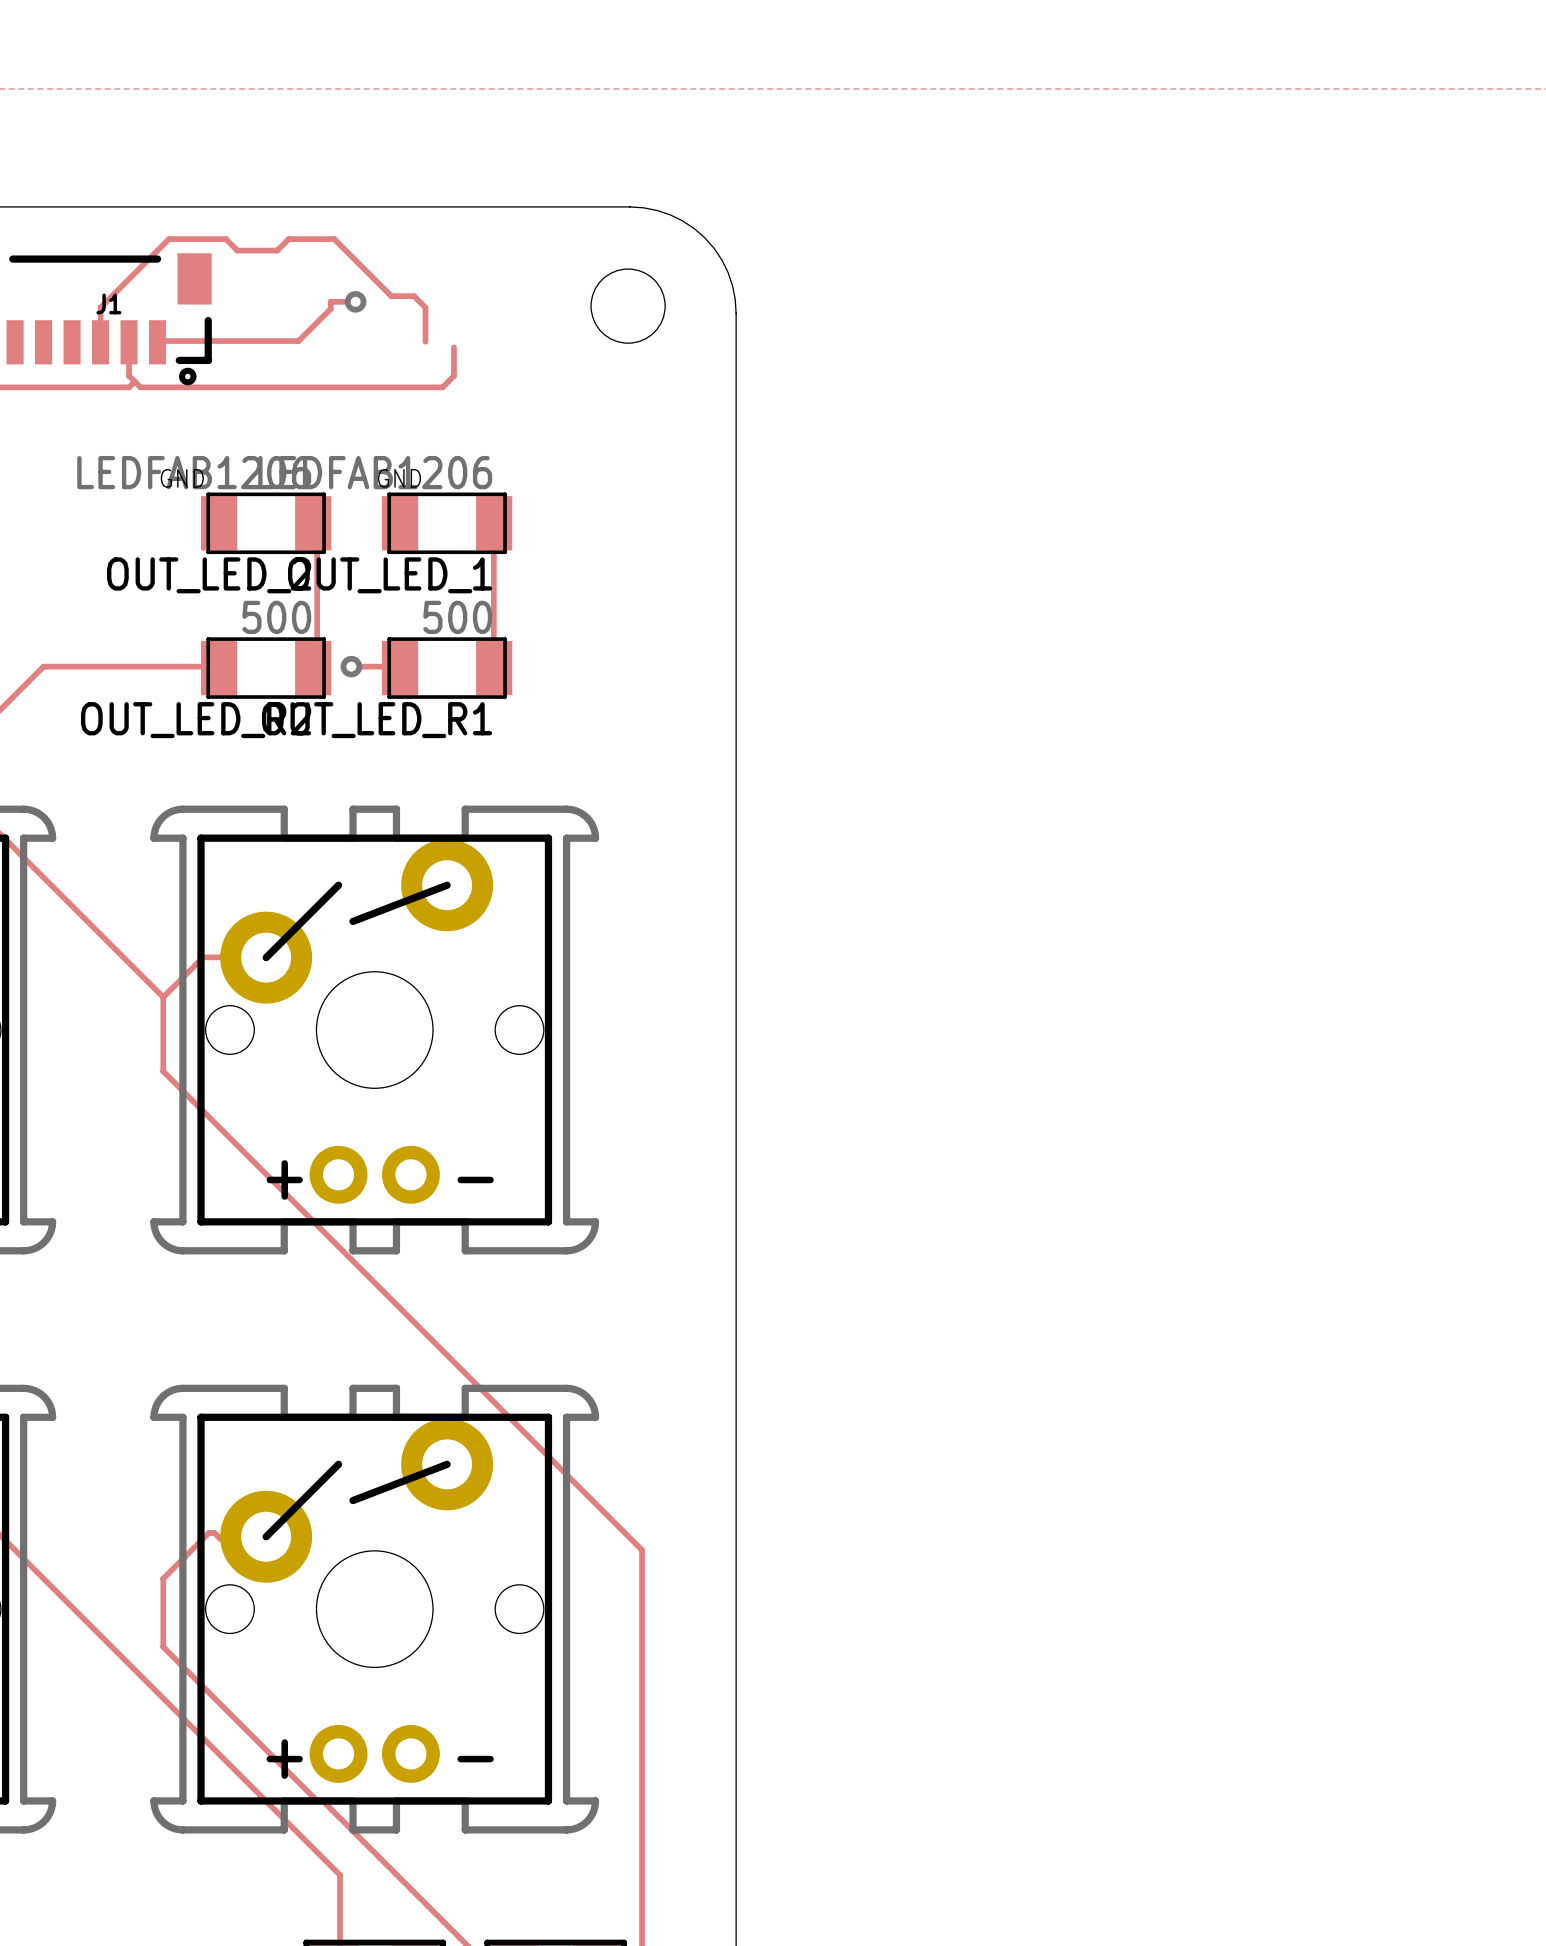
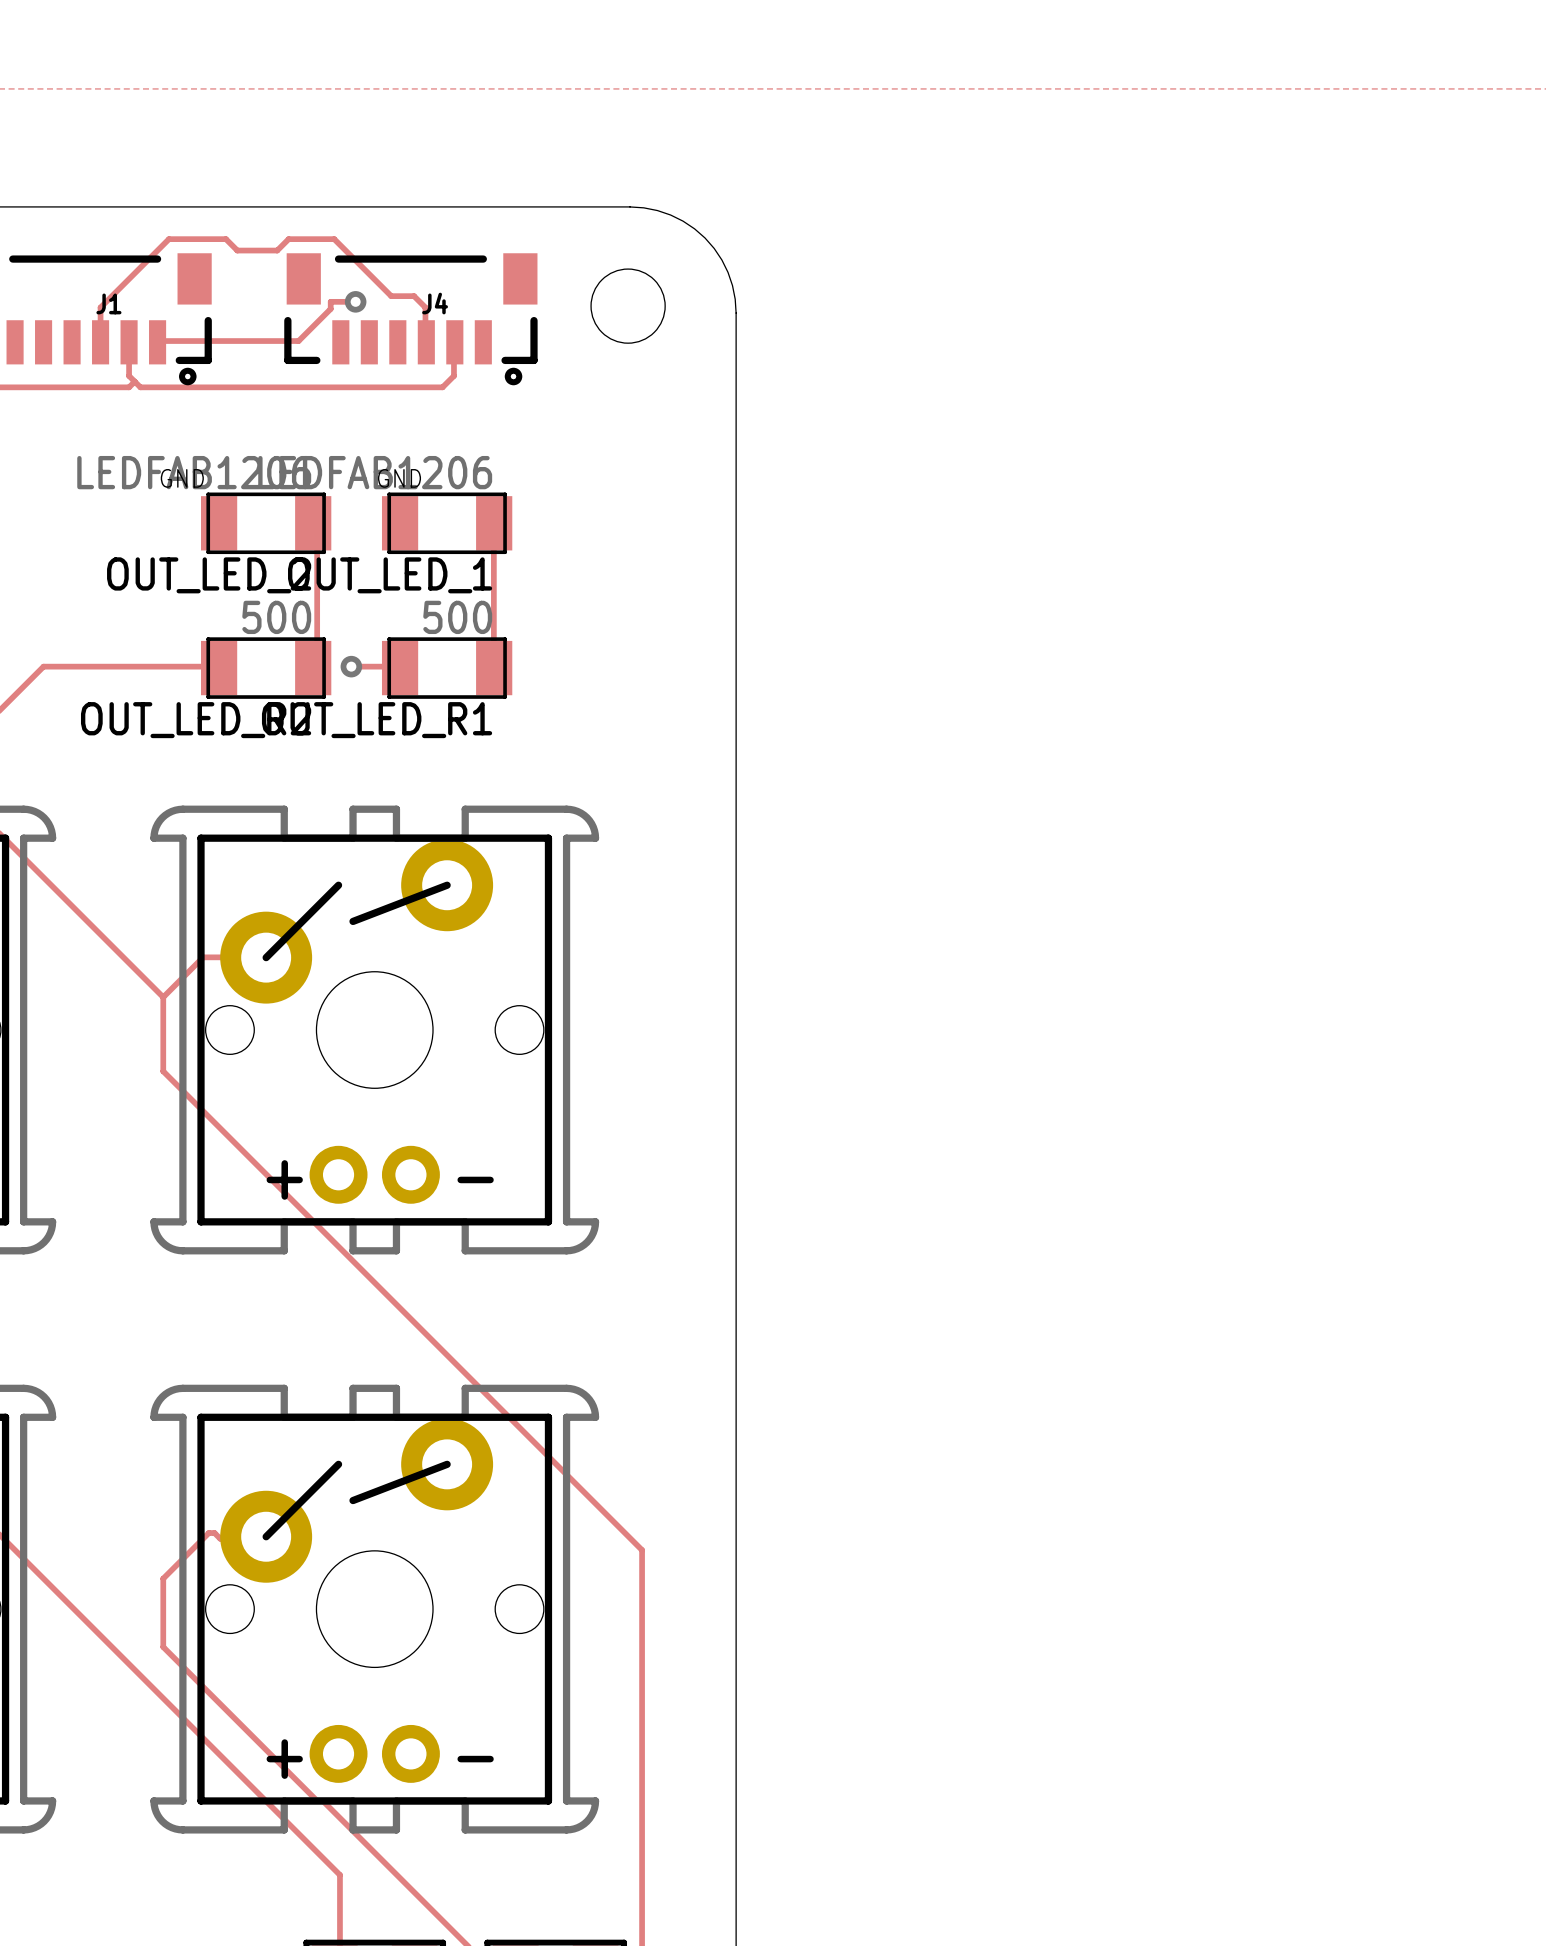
J4: none -> (410, 319)

